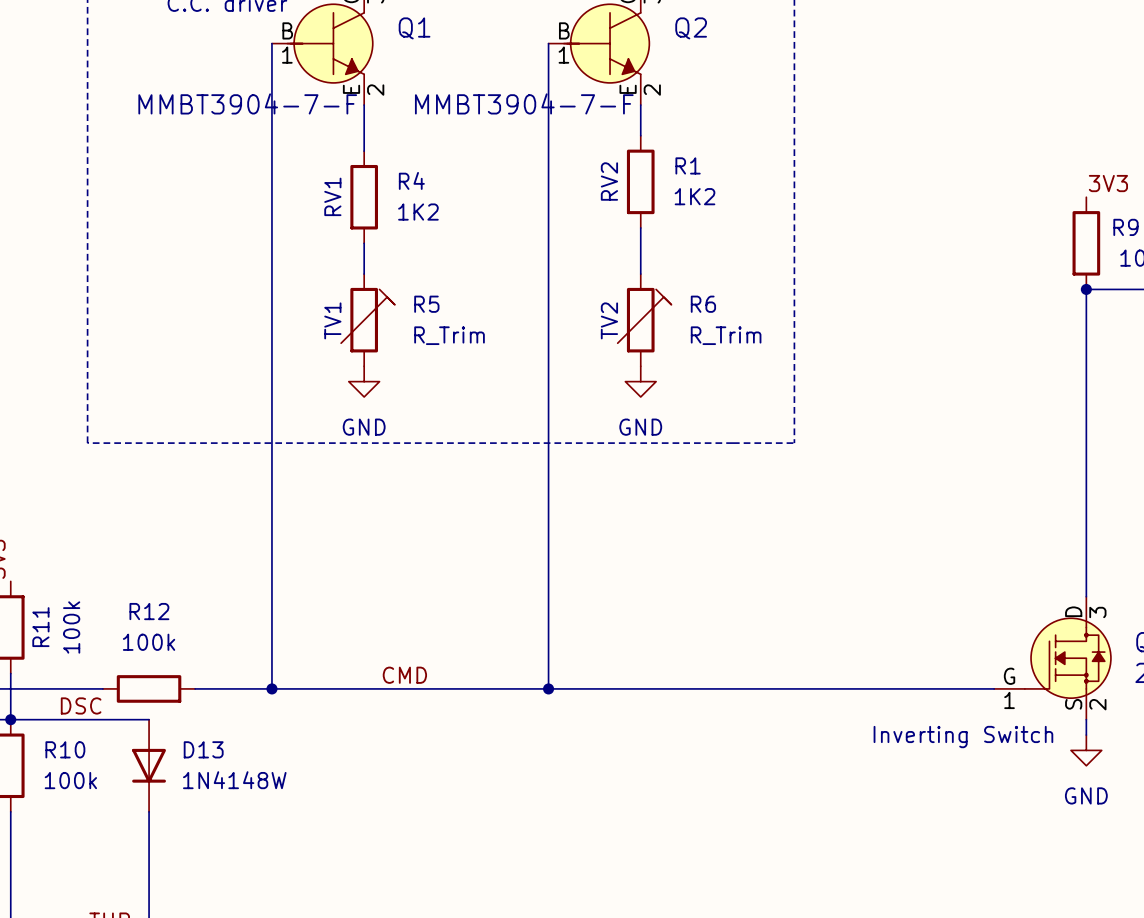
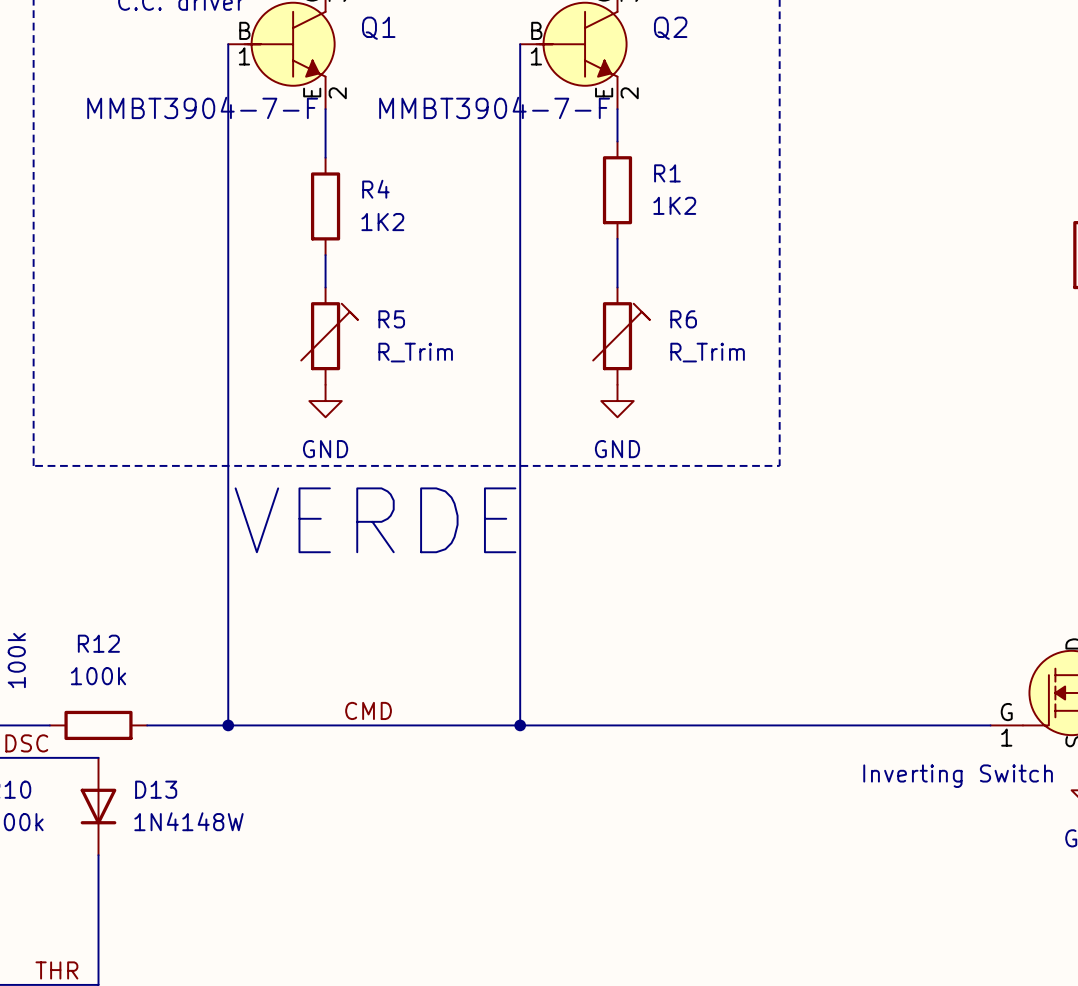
R1 text: RV2 (609, 181) -> none
R4 text: RV1 (332, 196) -> none
R5 text: TV1 (332, 320) -> none
R6 text: TV2 (609, 320) -> none
text: none -> VERDE (375, 520)

